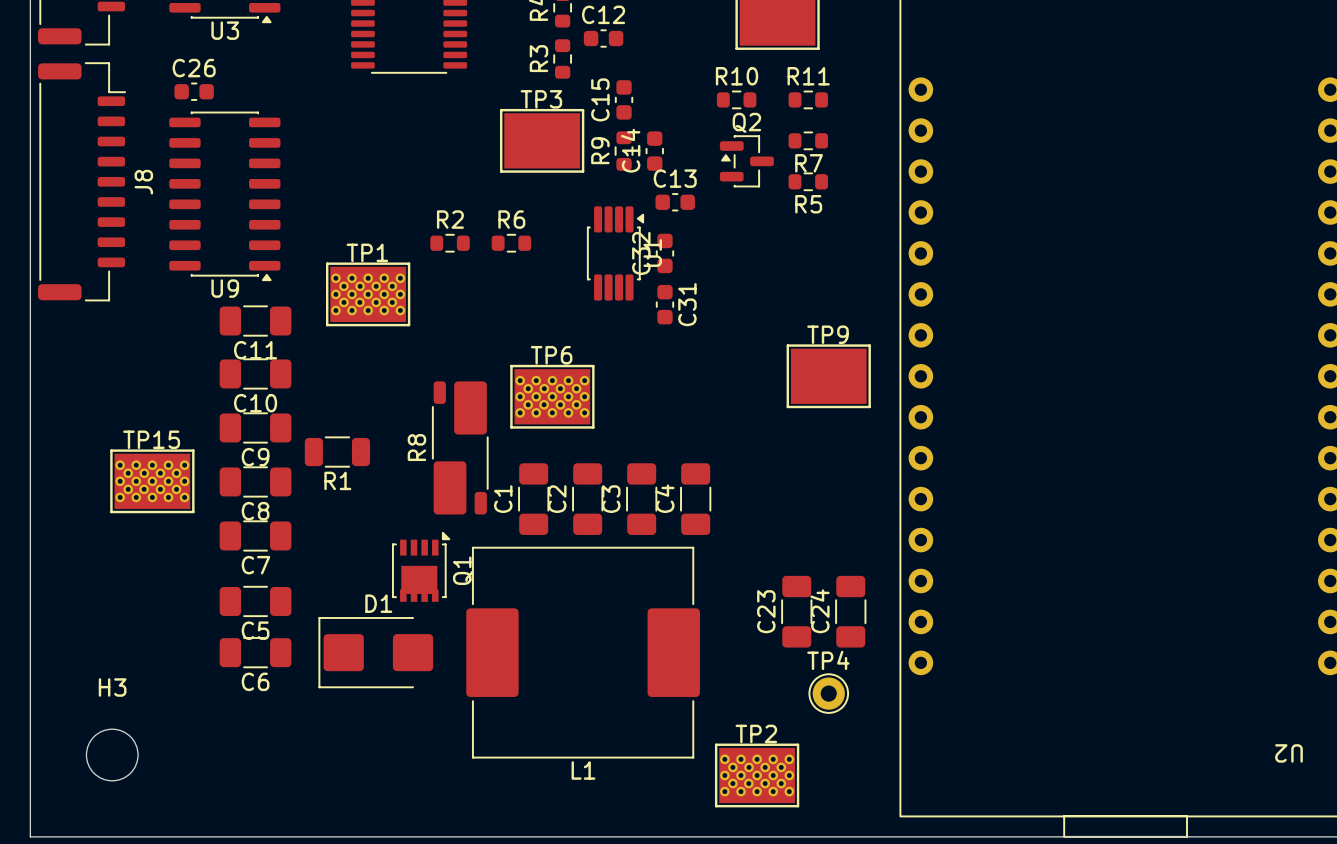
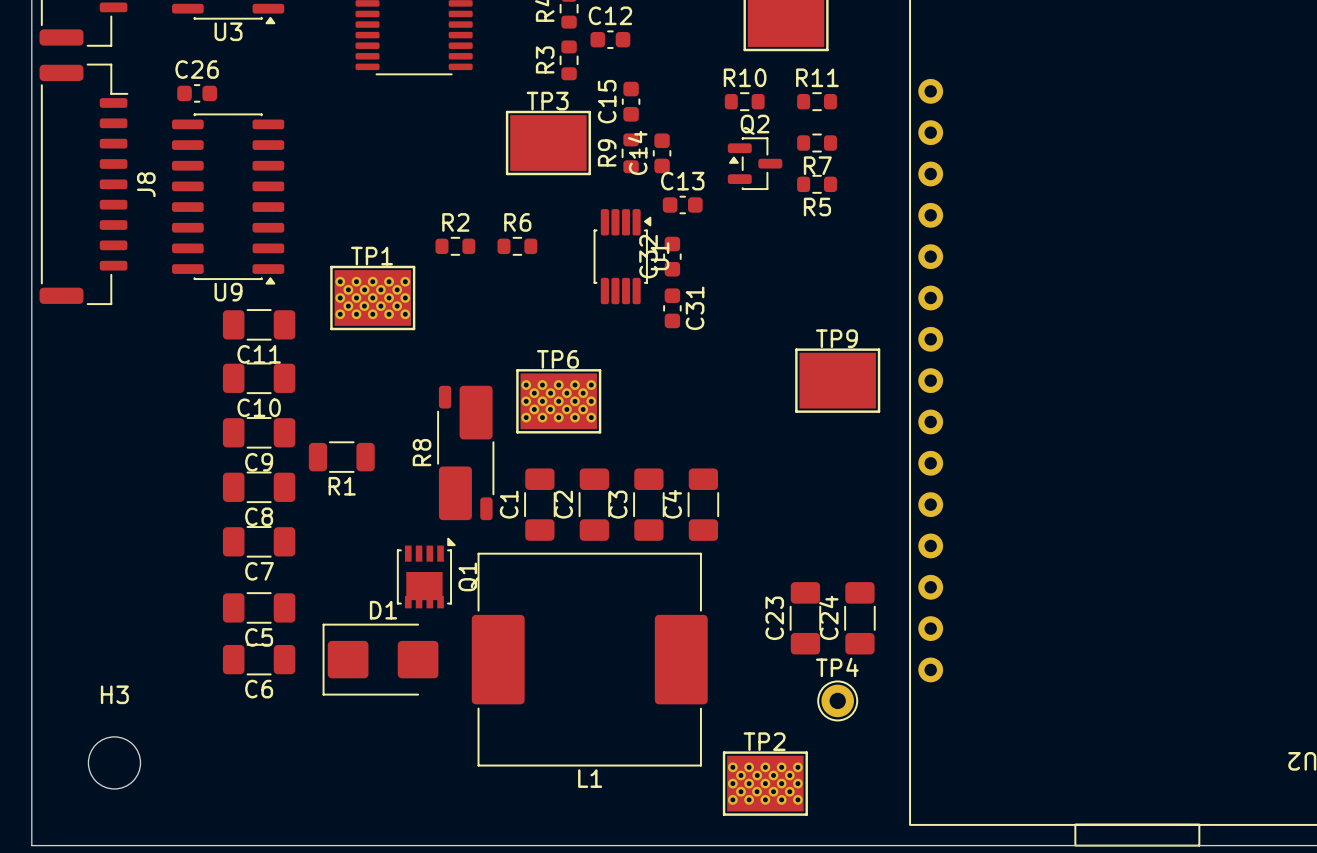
TP15: (152, 481) -> none

